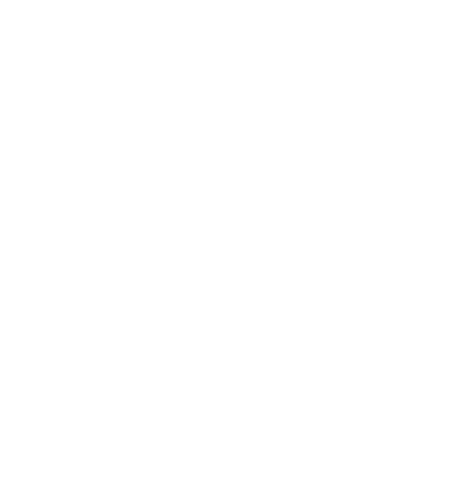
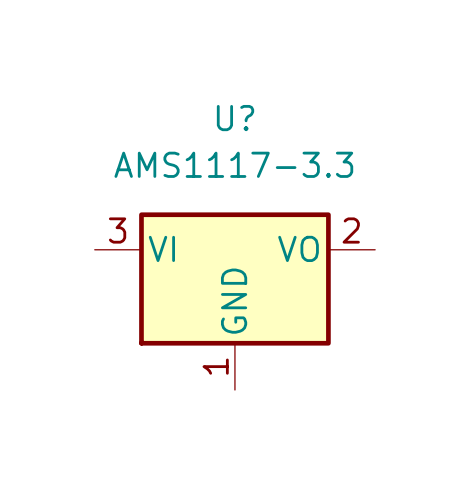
U?: none -> AMS1117-3.3 (234, 301)

